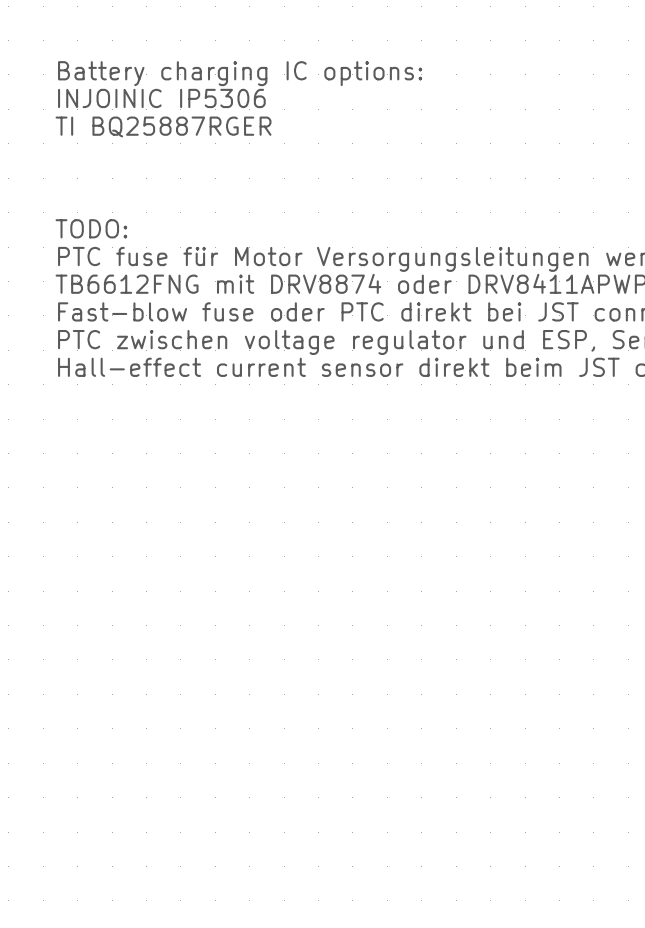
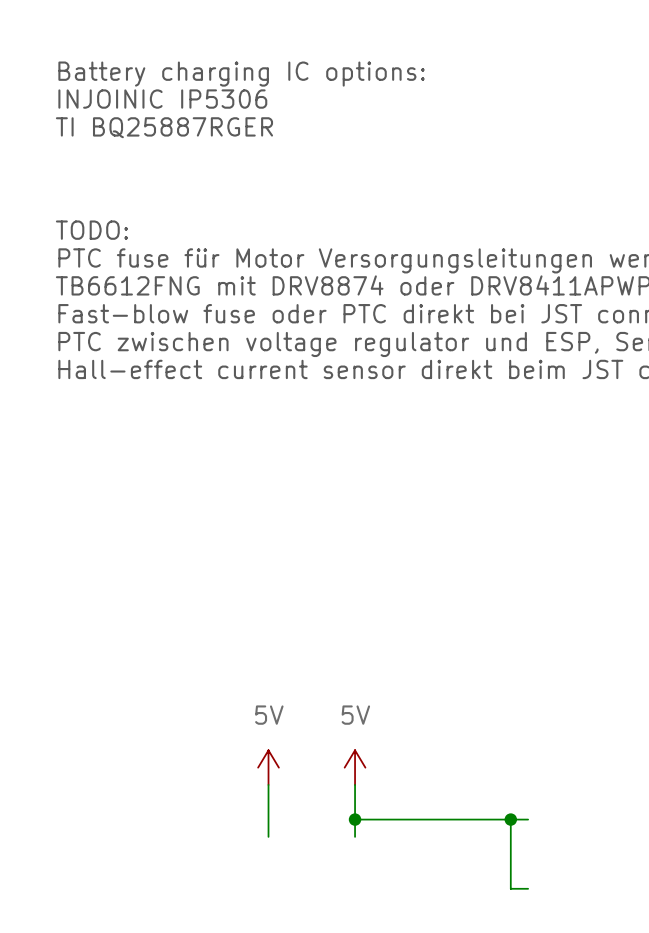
power symbol: none -> 5V (268, 767)
power symbol: none -> 5V (355, 767)
wire: none -> (268, 784) (268, 836)
wire: none -> (355, 784) (355, 836)
wire: none -> (355, 819) (528, 819)
junction: none -> (355, 819)
wire: none -> (510, 819) (510, 888) (528, 888)
junction: none -> (510, 819)

